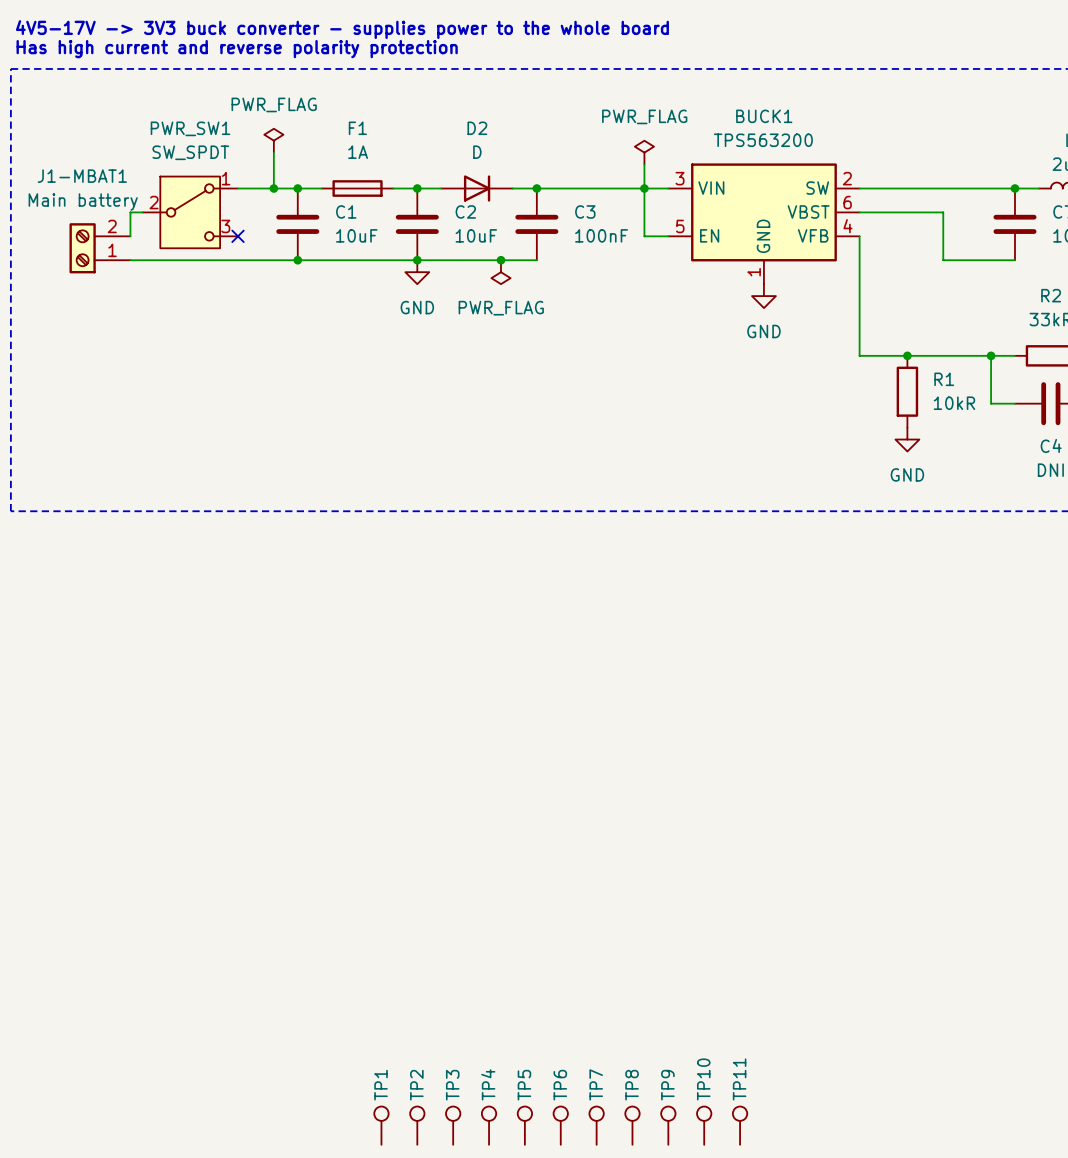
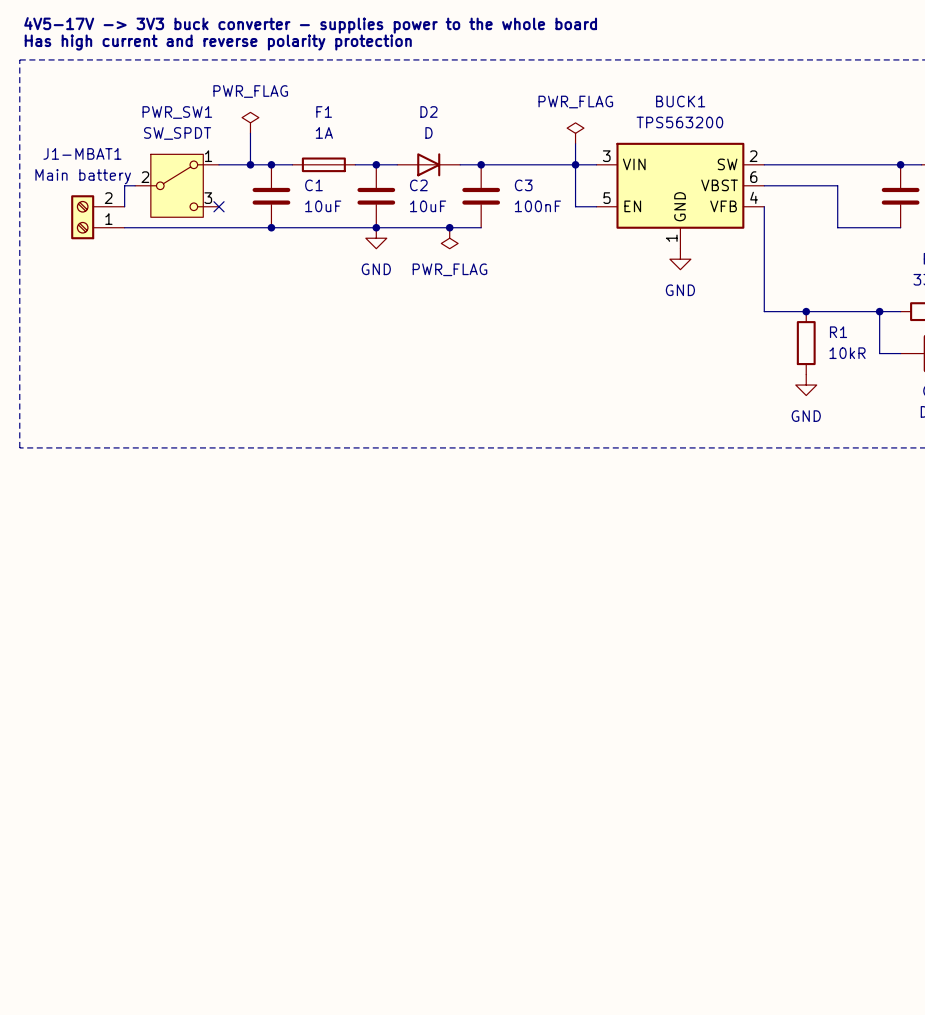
TP1: (381, 1125) -> none
TP2: (417, 1125) -> none
TP3: (453, 1125) -> none
TP4: (489, 1125) -> none
TP5: (524, 1125) -> none
TP6: (560, 1125) -> none
TP7: (596, 1125) -> none
TP8: (632, 1125) -> none
TP9: (668, 1125) -> none
TP10: (704, 1125) -> none
TP11: (740, 1125) -> none

